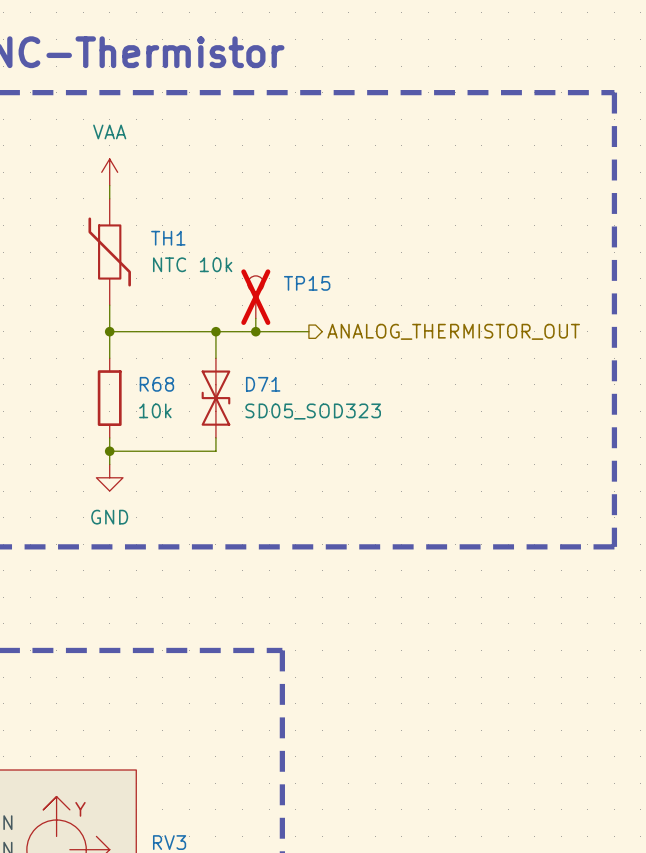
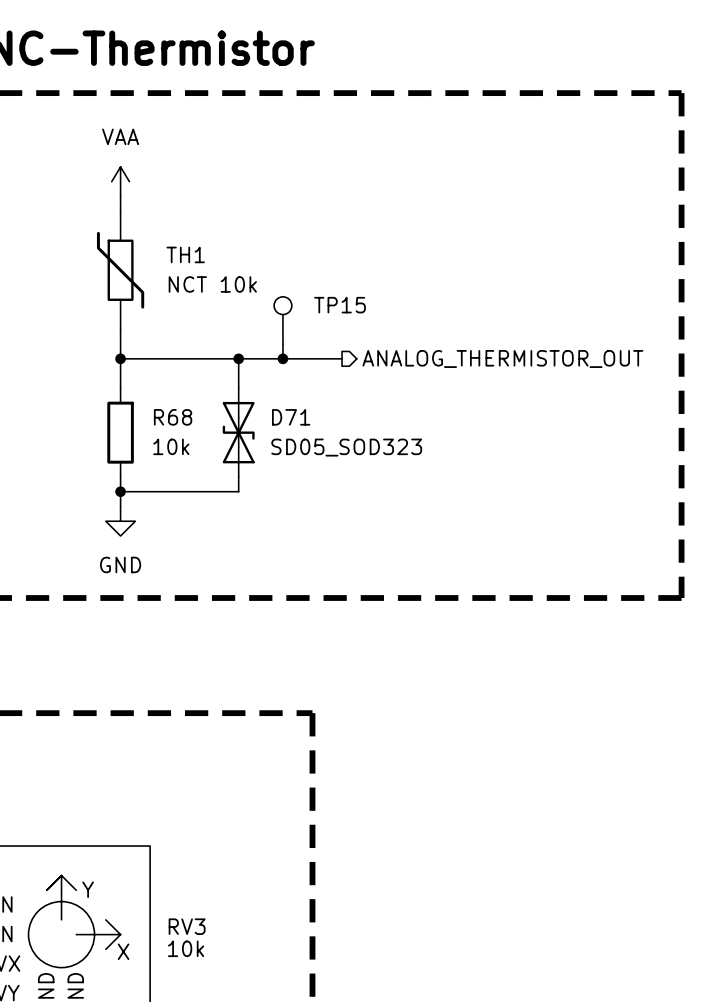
TH1 value: NTC 10k (192, 264) -> NCT 10k (212, 284)
TP15 do-not-place cross: (255, 297) -> none

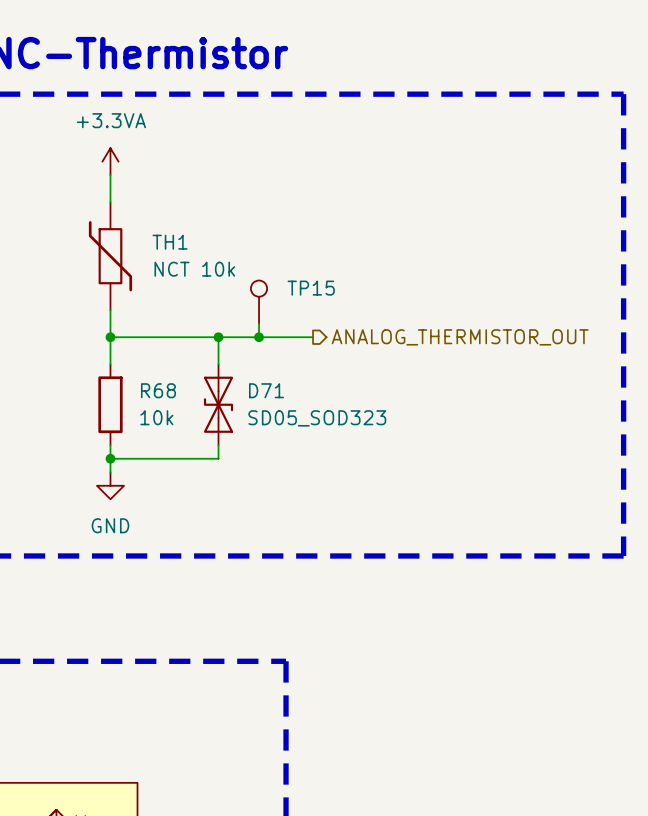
power symbol: none -> +3.3VA (110, 161)
power symbol: VAA (120, 181) -> none

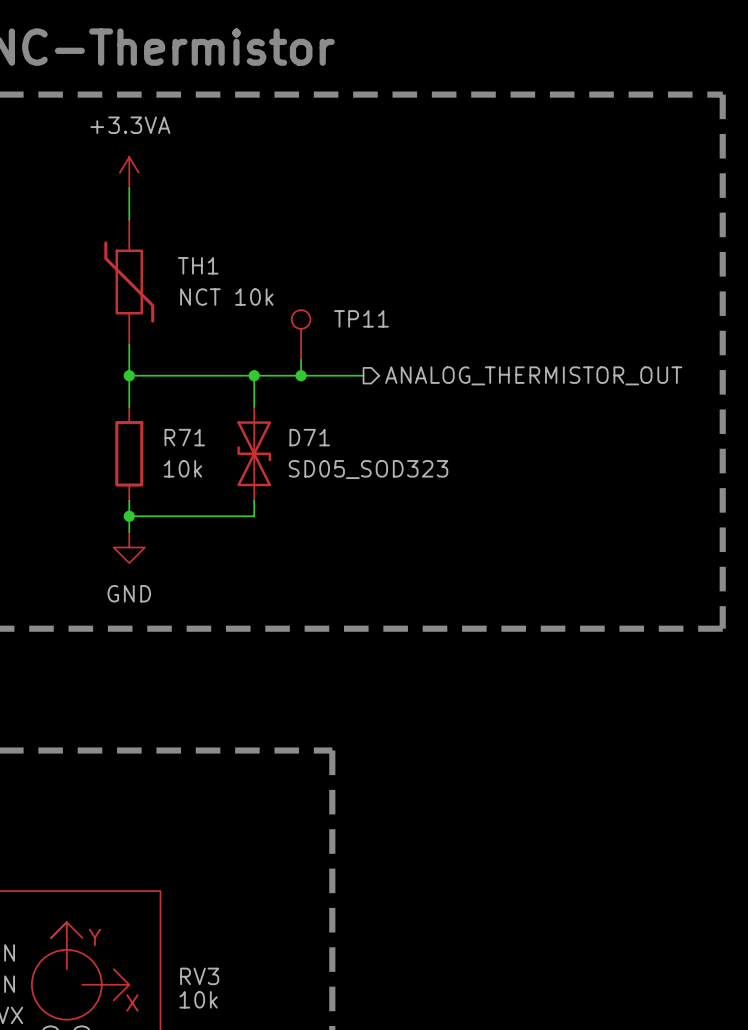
TP15 name: TP15 (311, 288) -> TP11 (361, 318)
R68 name: R68 (158, 390) -> R71 (184, 437)

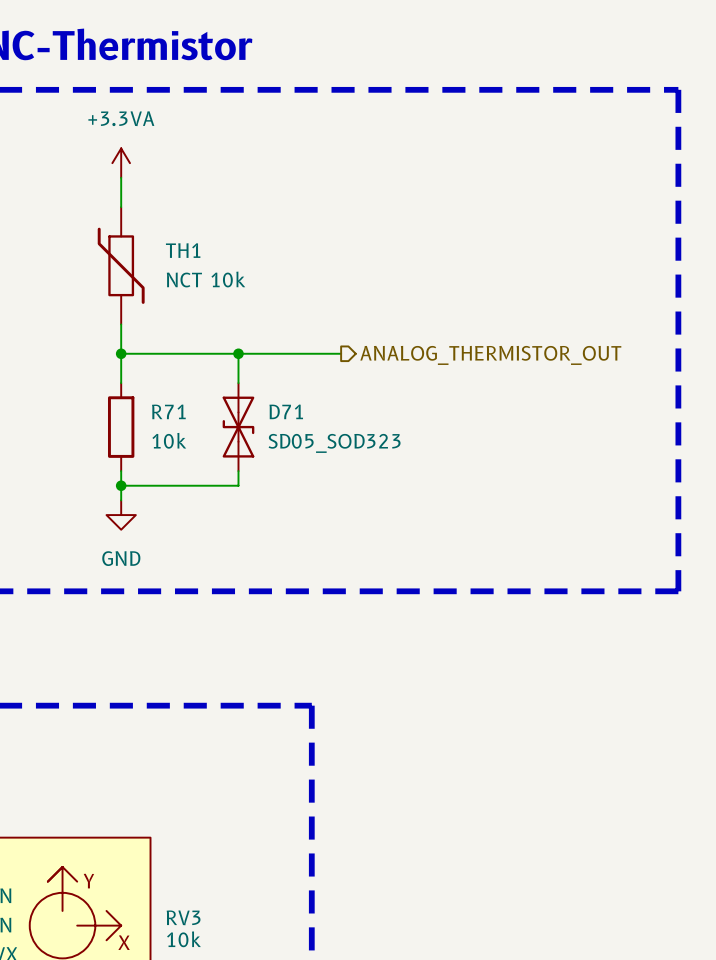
TP11: (301, 335) -> none
wire: (301, 360) (301, 375) -> none
junction: (301, 375) -> none

